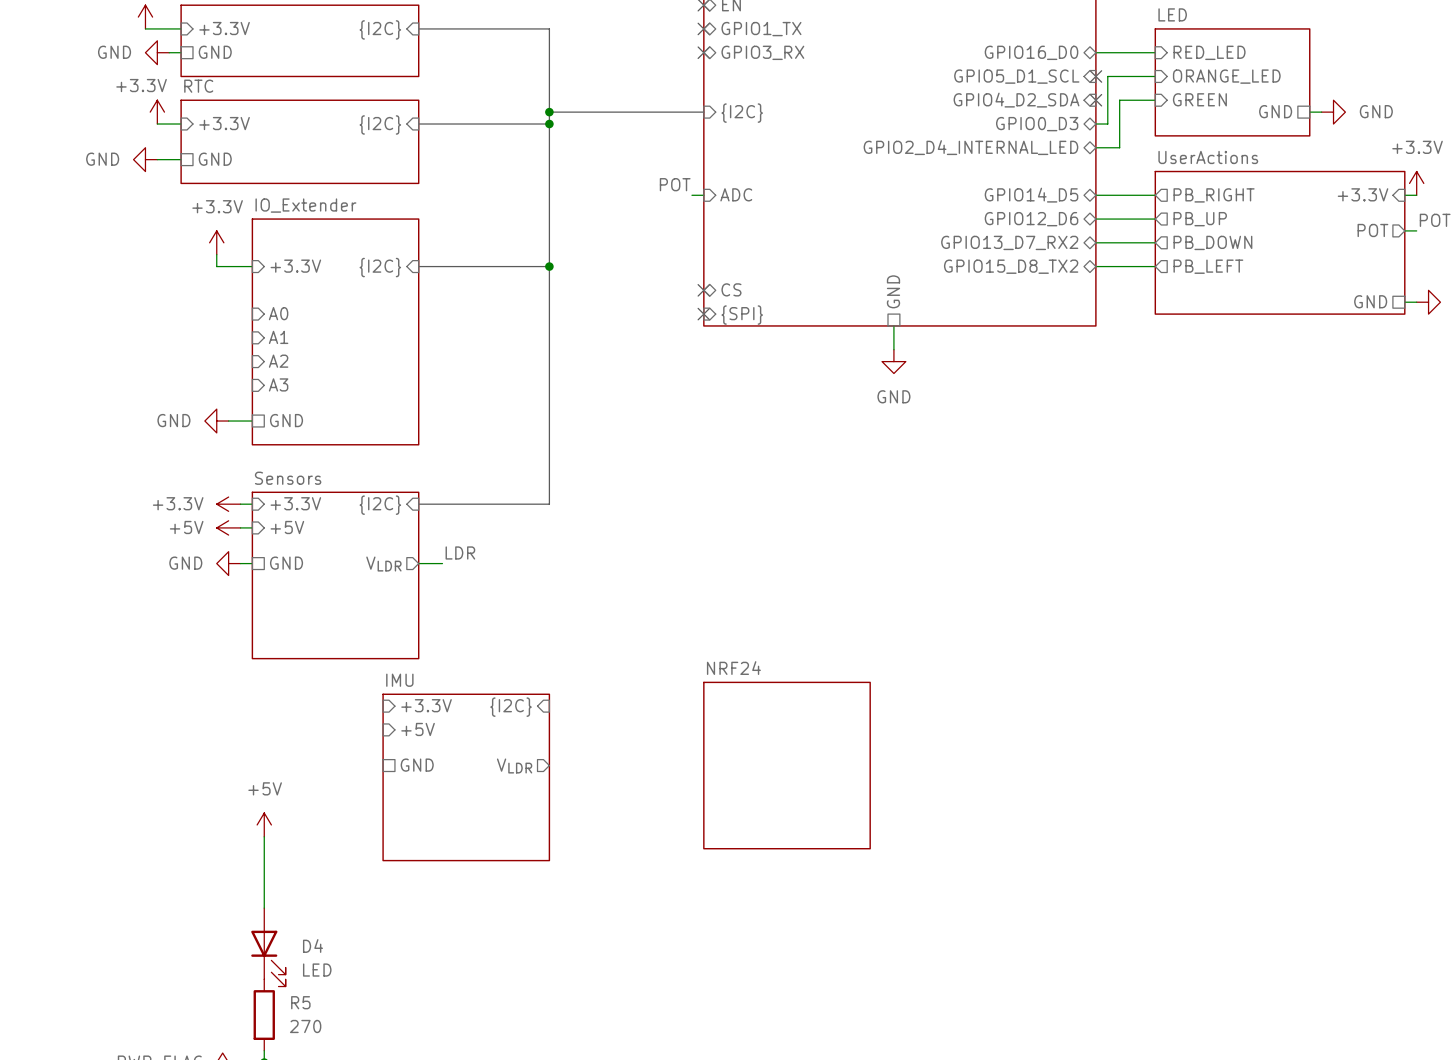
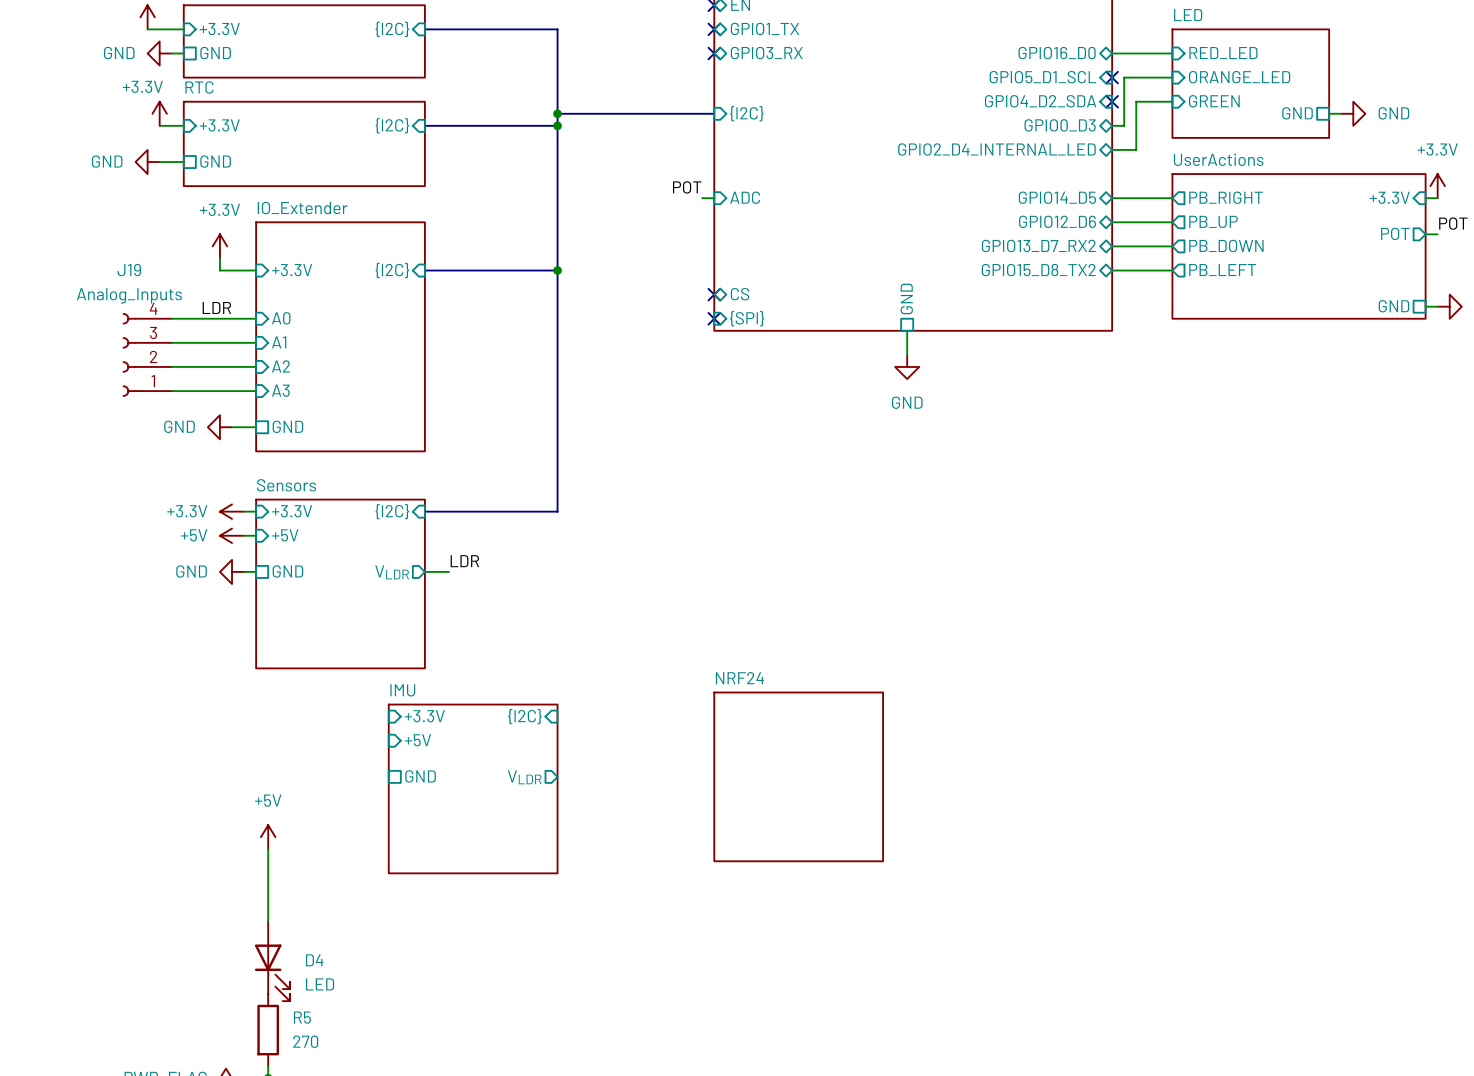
label: none -> LDR (216, 307)
wire: none -> (171, 318) (256, 318)
wire: none -> (171, 342) (256, 342)
J19: none -> Analog_Inputs (147, 354)
wire: none -> (171, 366) (256, 366)
wire: none -> (171, 391) (256, 391)

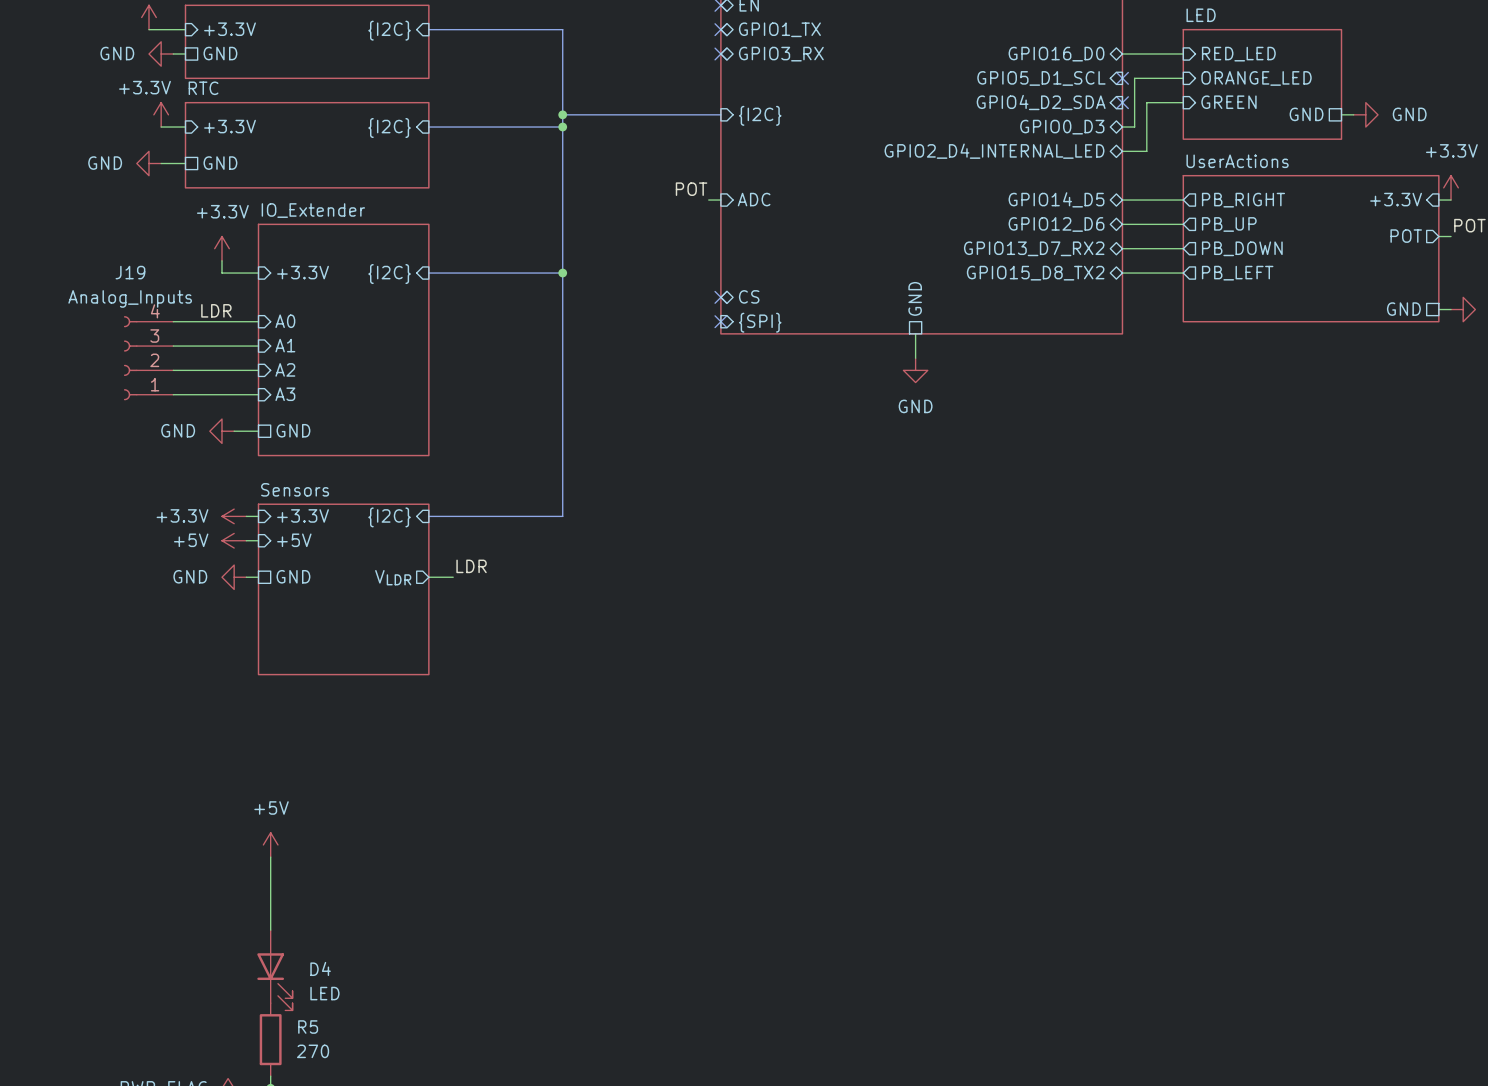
sheet pin: +3.3V (424, 716) -> none
sheet pin: {I2C} (524, 716) -> none
sheet pin: +5V (417, 740) -> none
sheet pin: GND (420, 776) -> none
sheet NRF24: (798, 776) -> none
sheet pin: VLDR (524, 777) -> none
sheet IMU: (473, 788) -> none

